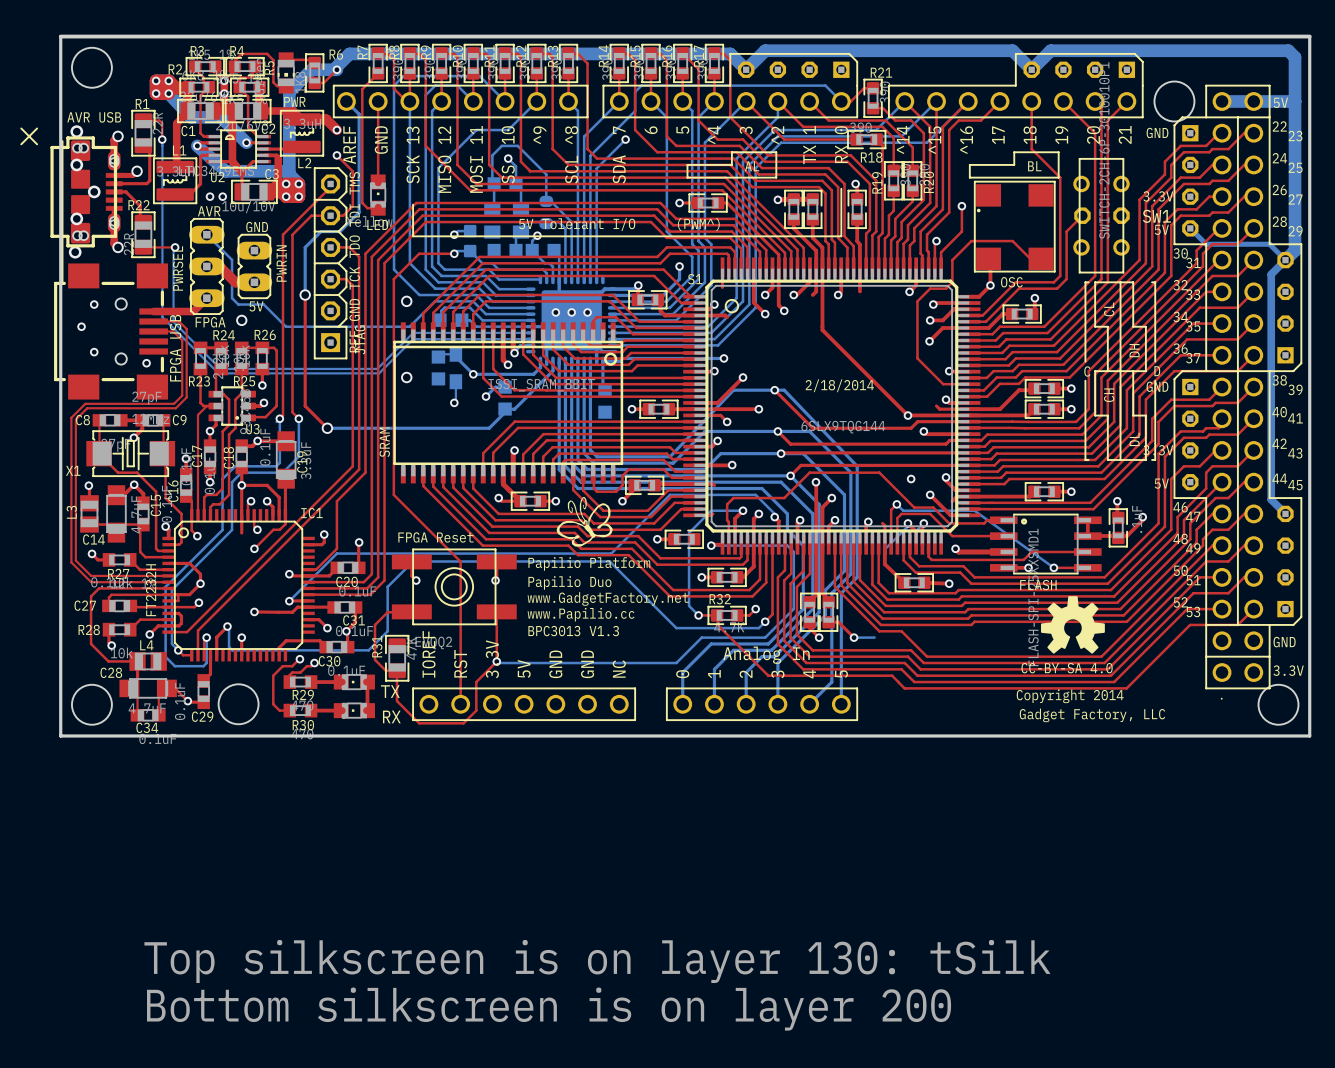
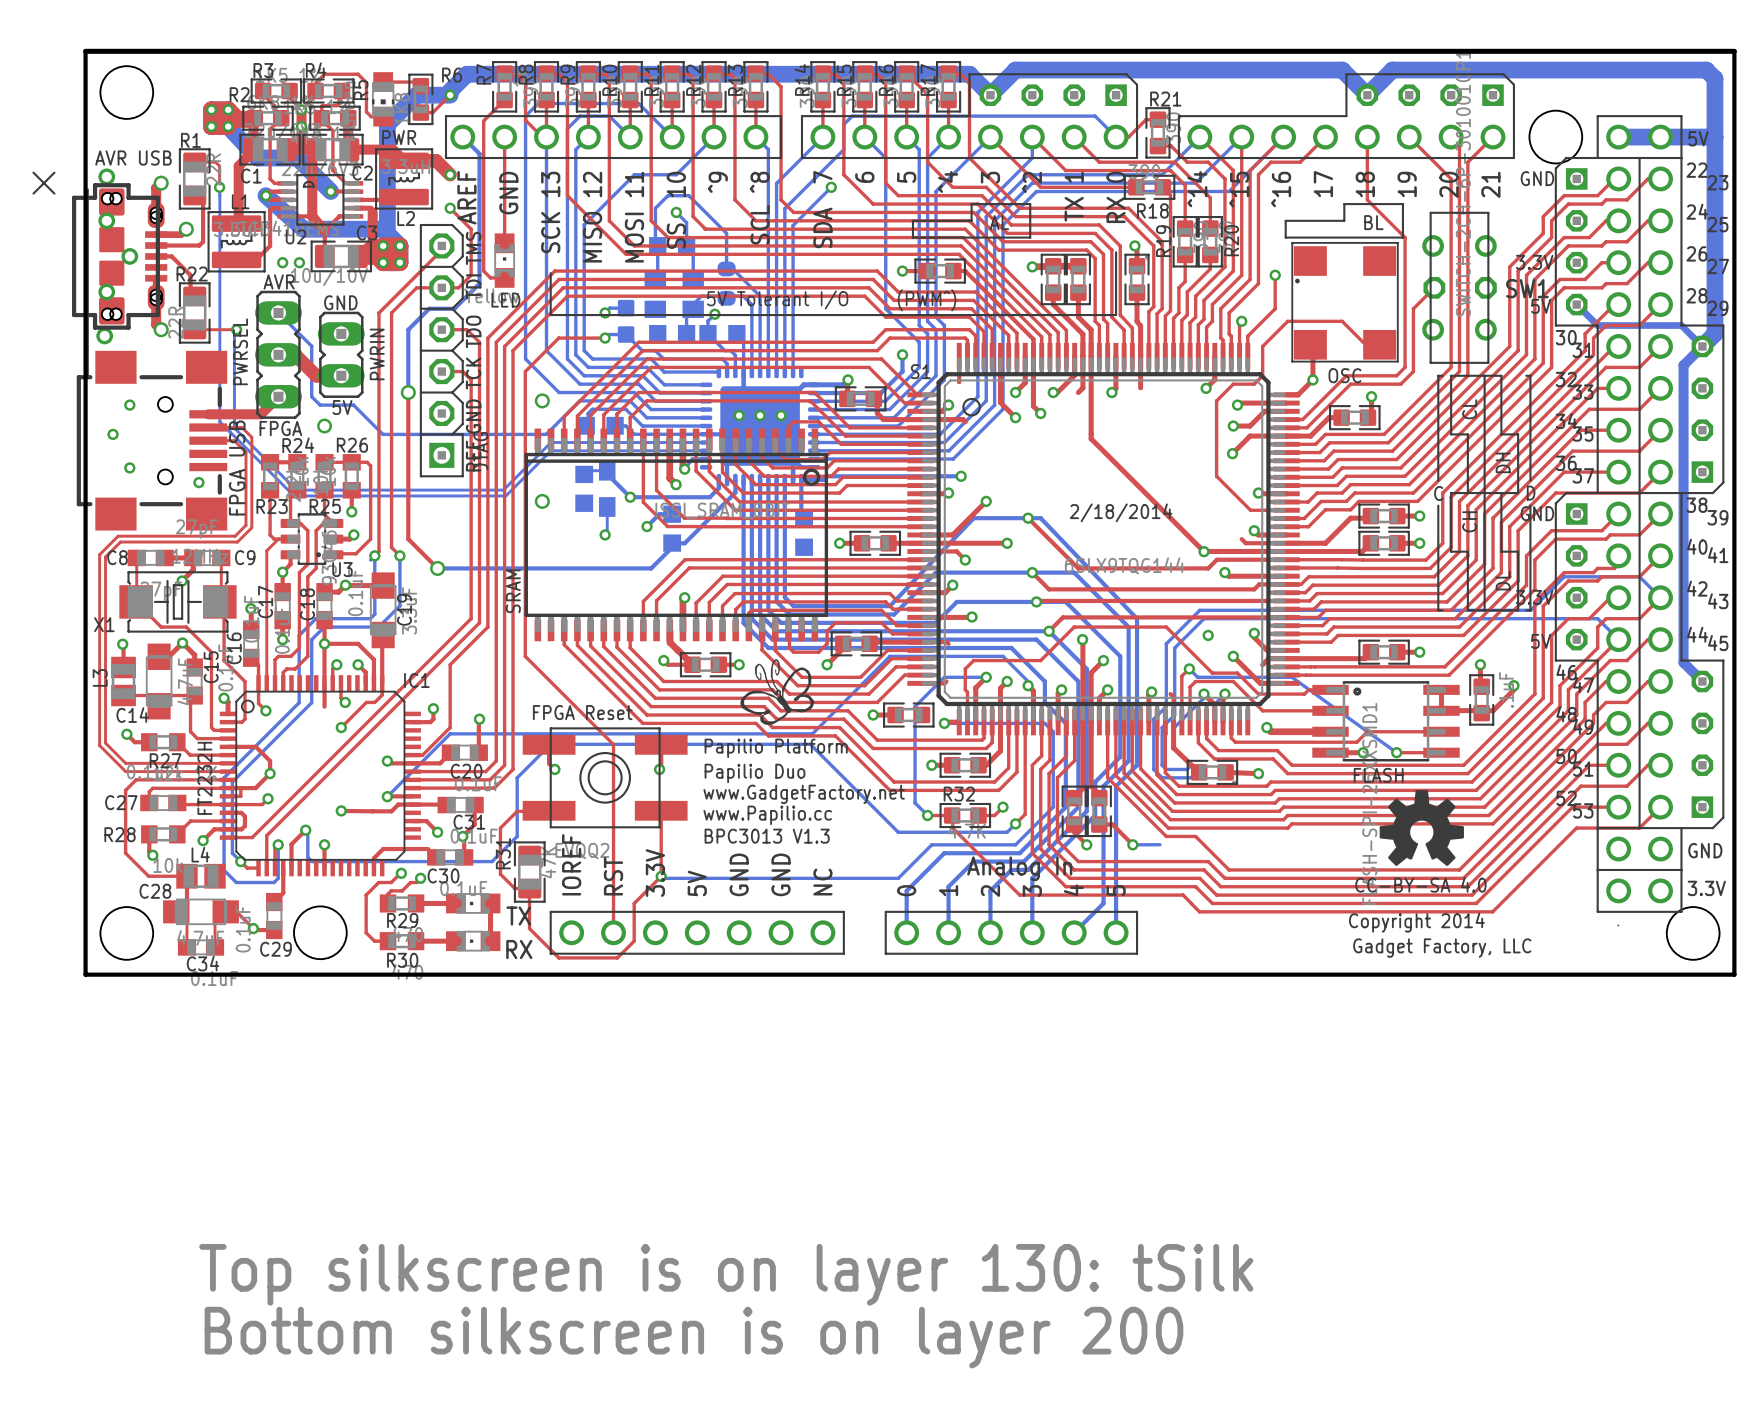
bottom track: none -> (1660, 597) (1639, 576) (1564, 576) (1530, 610) (1199, 610) (1166, 643) (1166, 706) (1153, 719) (1153, 769) (1162, 777) (1191, 777) (1198, 770)
bottom track: none -> (1618, 639) (1597, 618) (1204, 618) (1174, 648) (1174, 715) (1162, 727) (1162, 765) (1166, 769) (1187, 769) (1190, 766)

